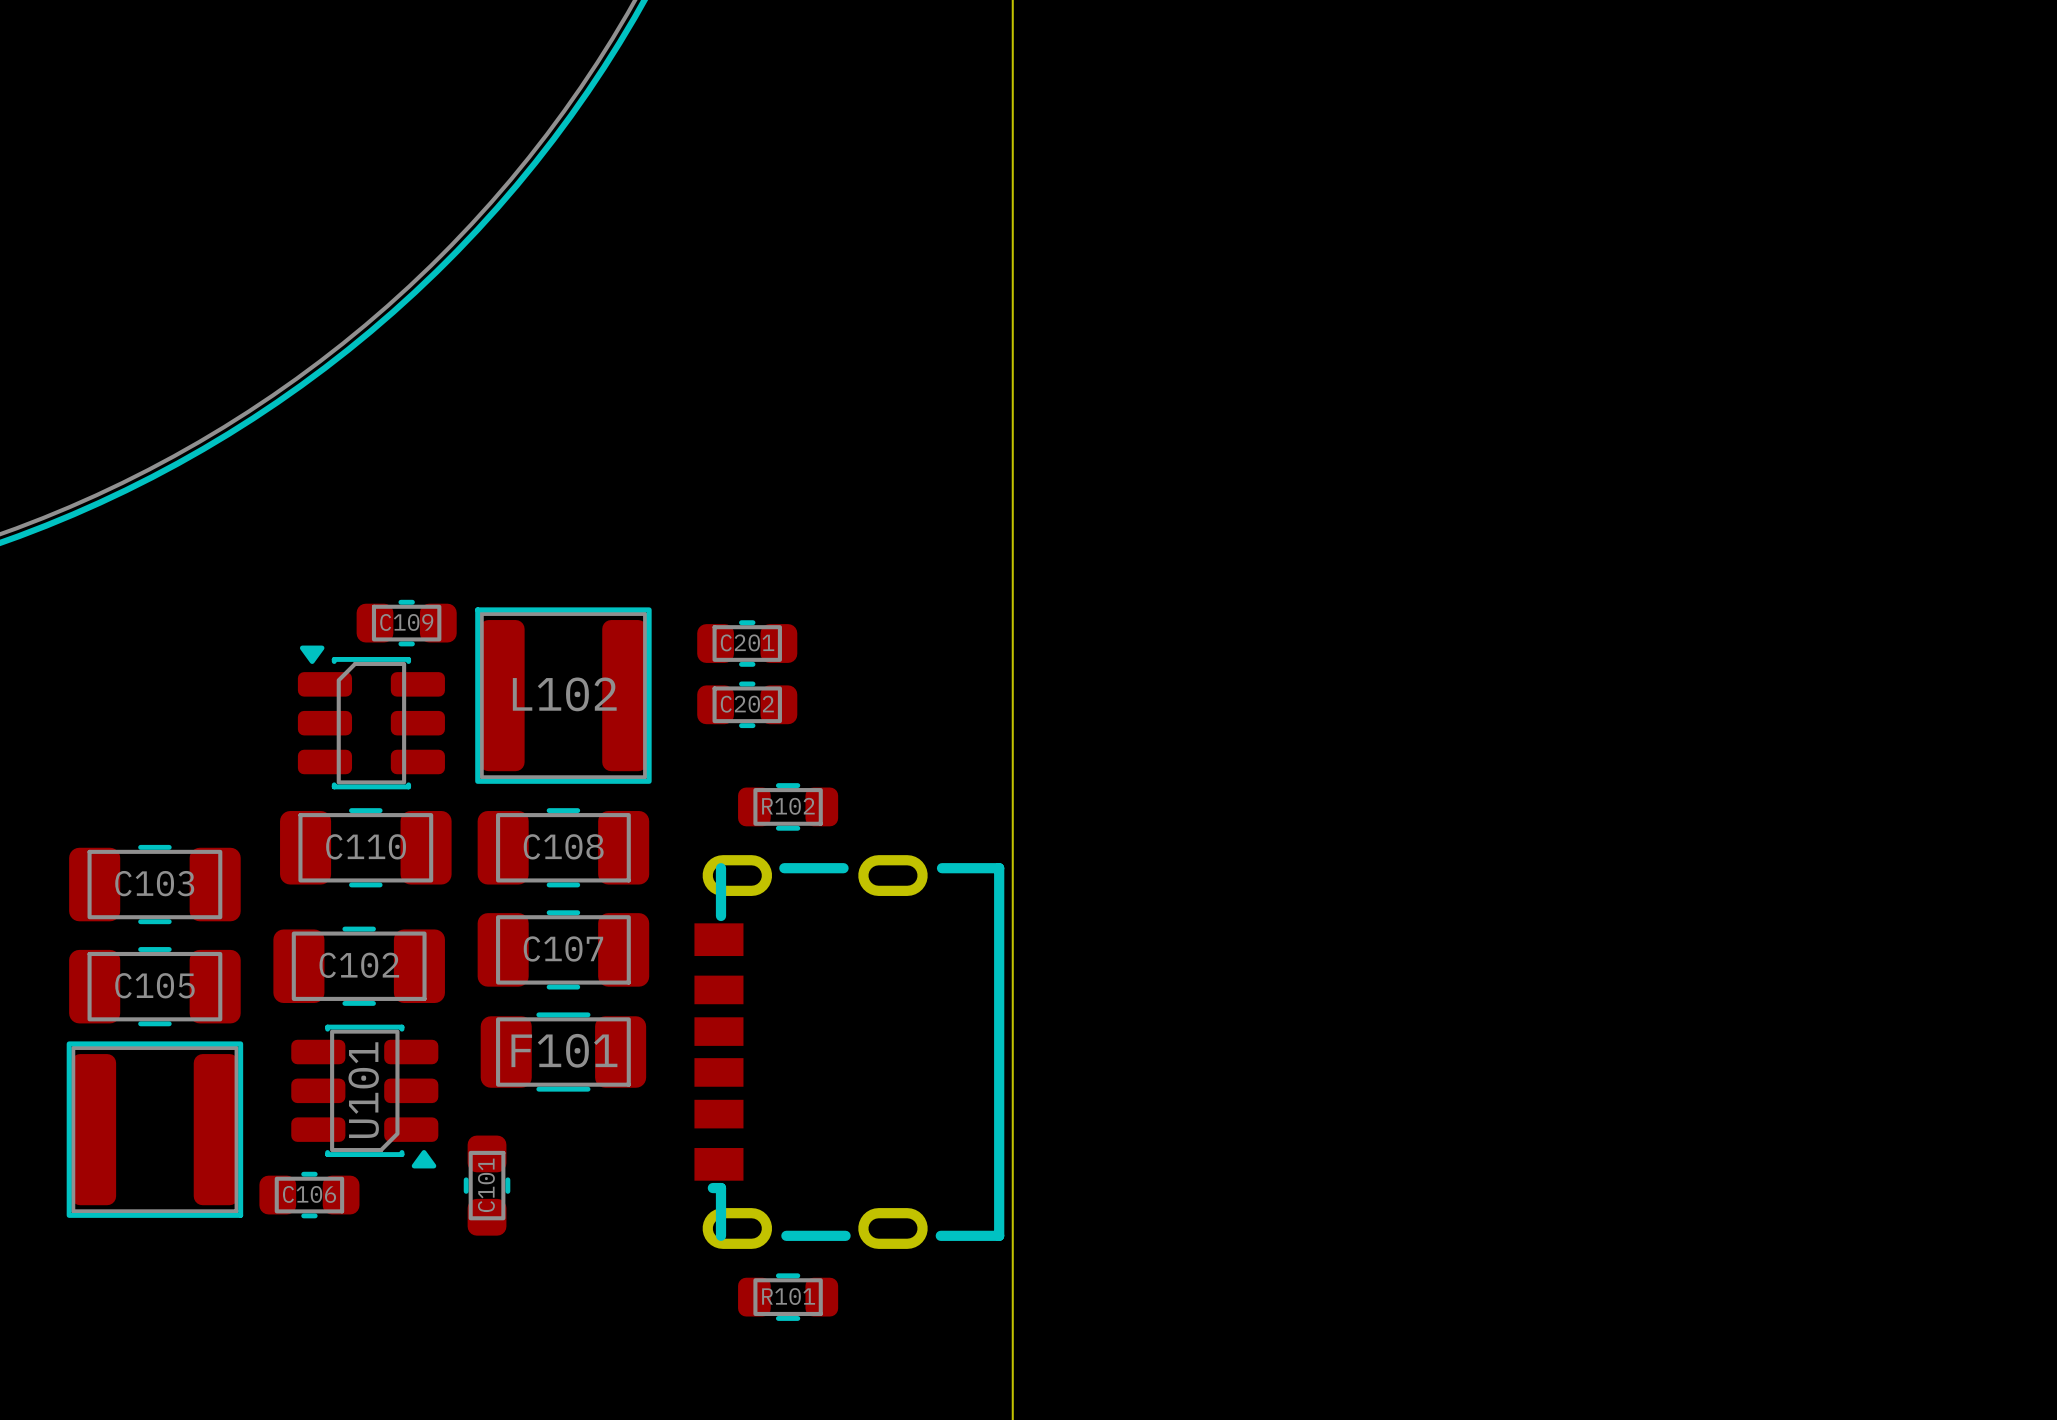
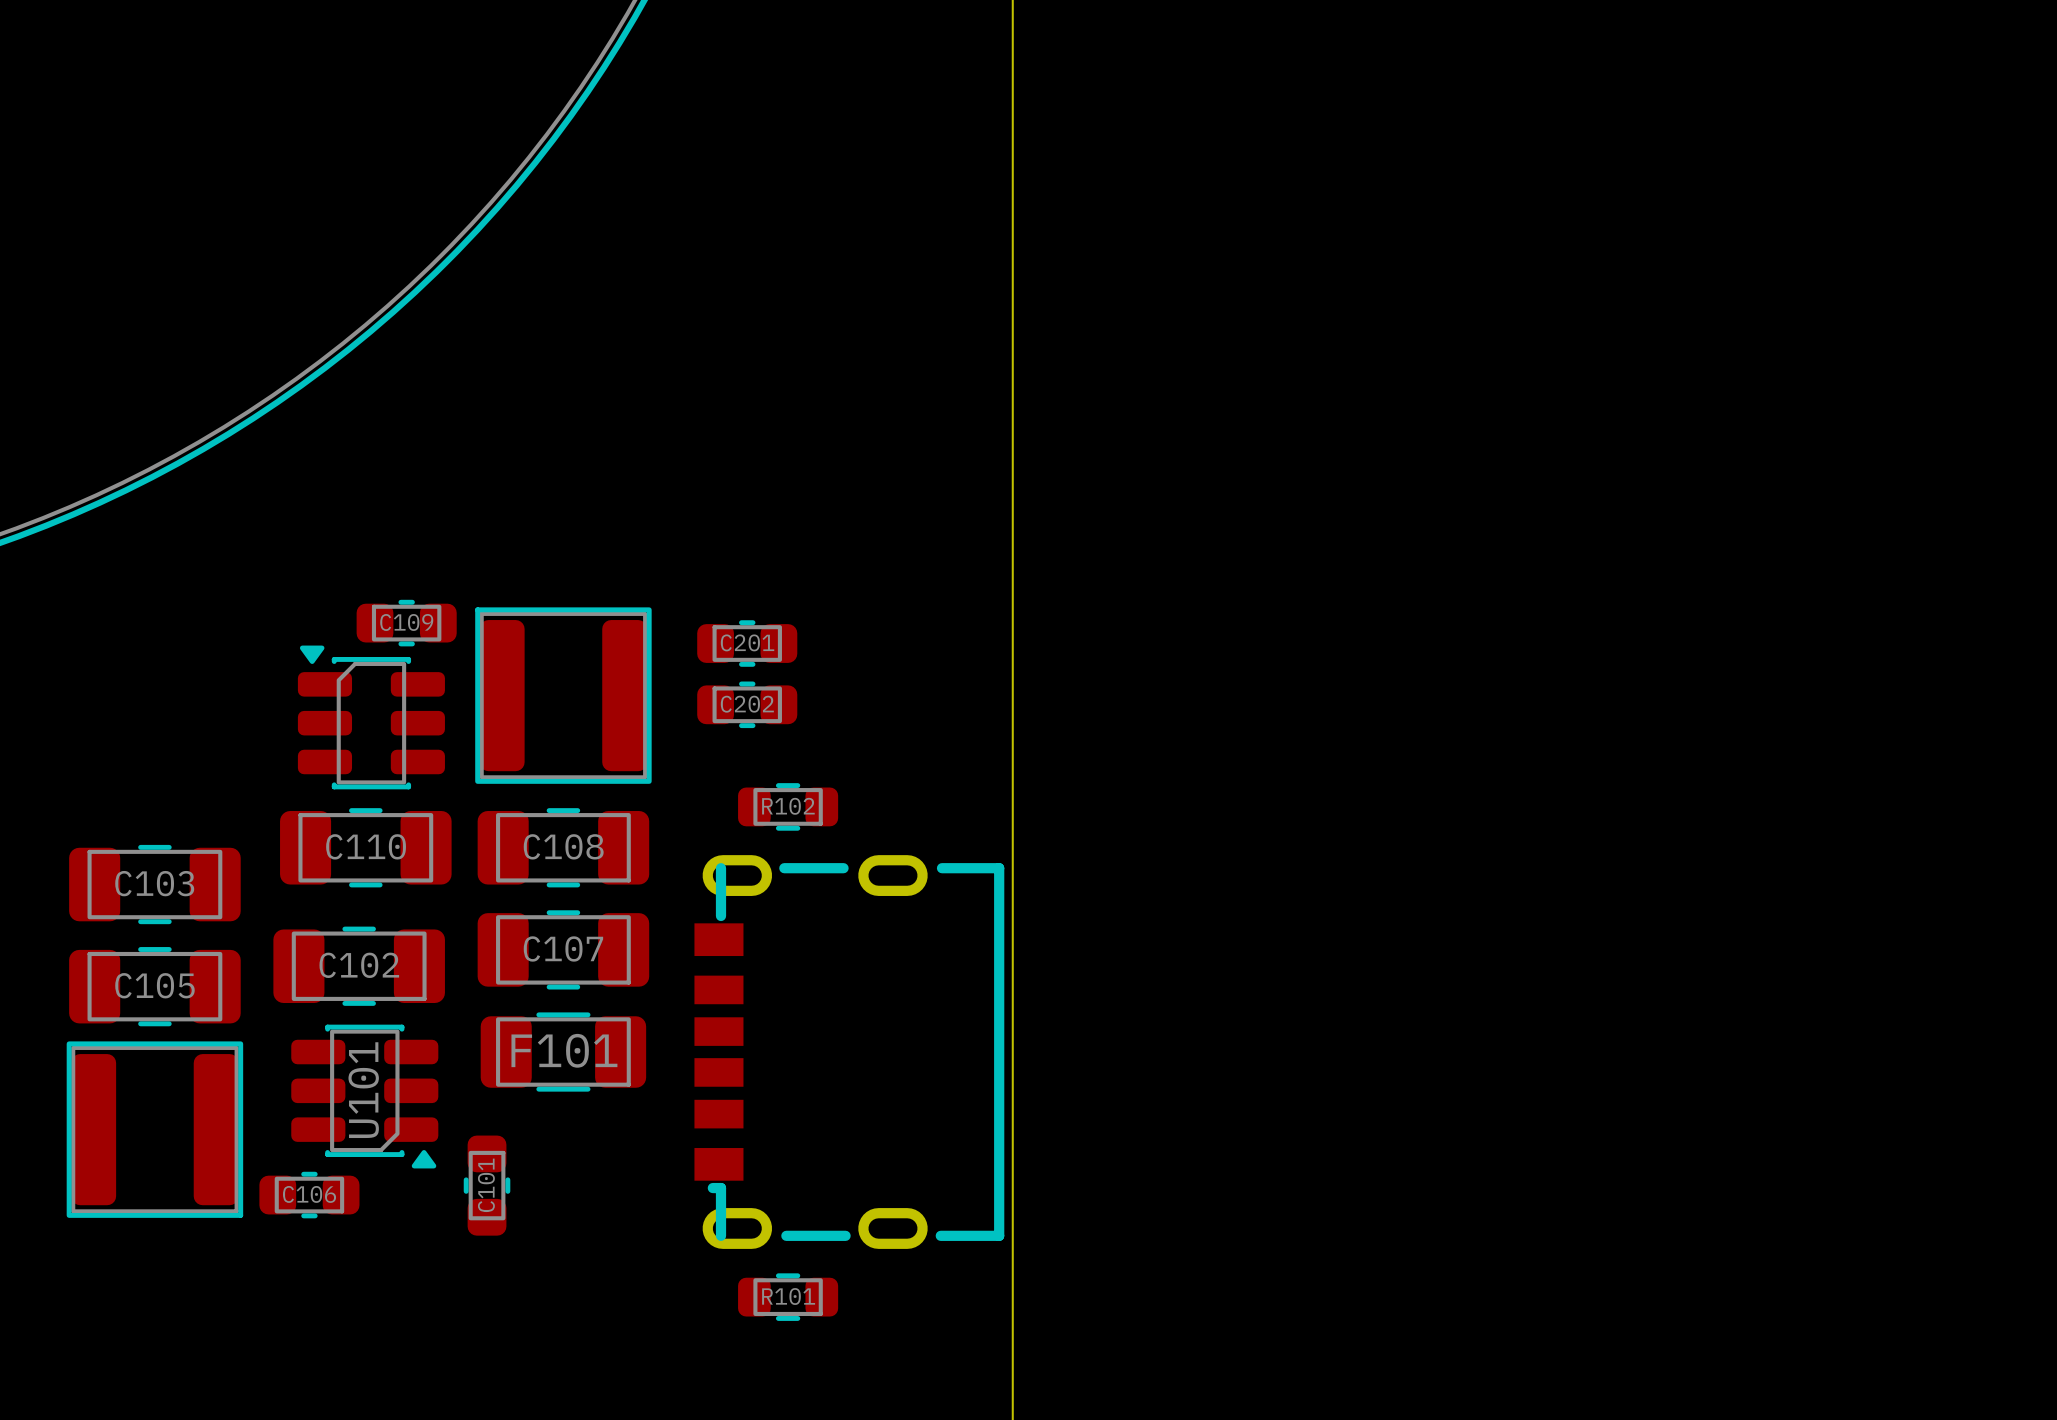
L102 name: L102 (564, 694) -> none

